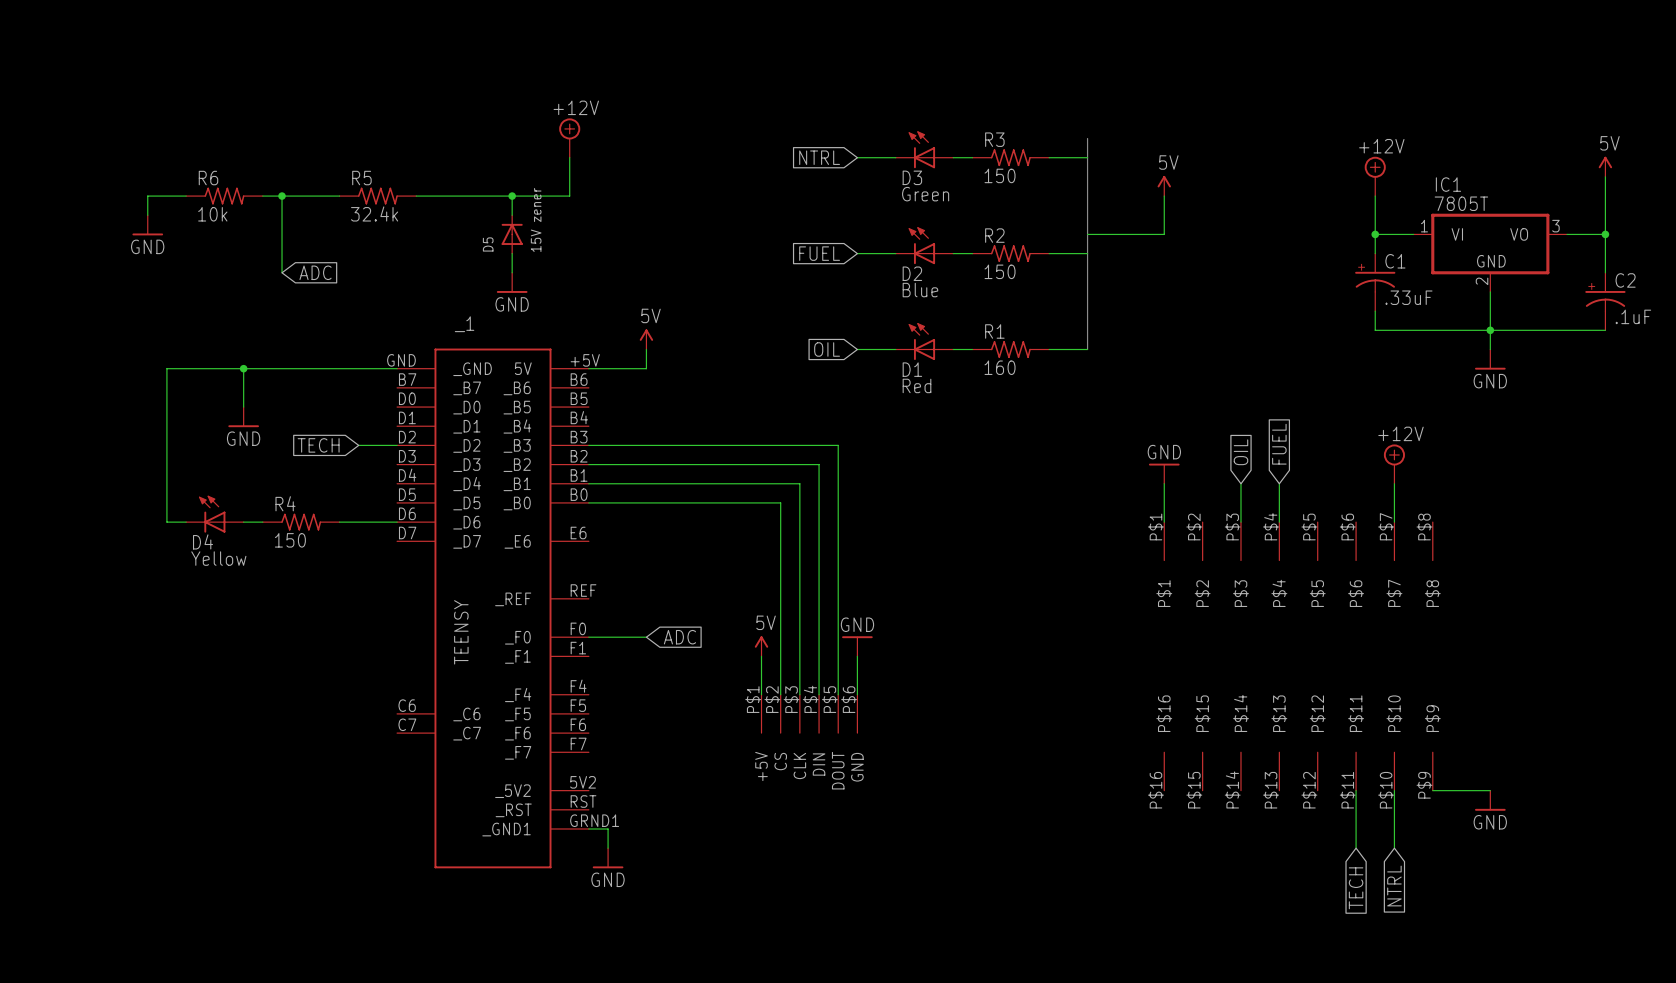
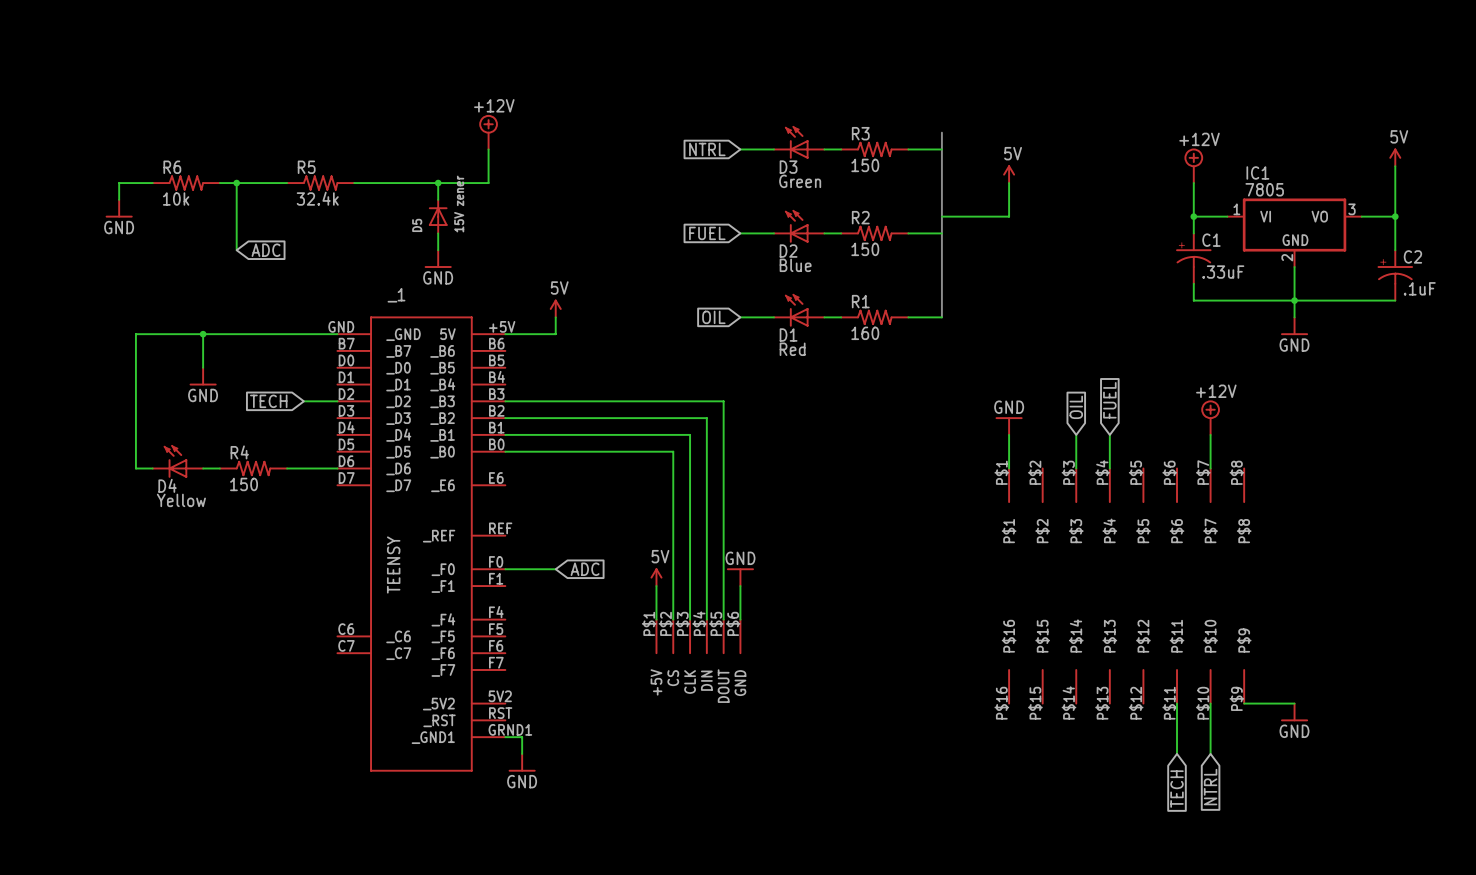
IC1 value: 7805T (1461, 203) -> 7805 (1264, 189)

